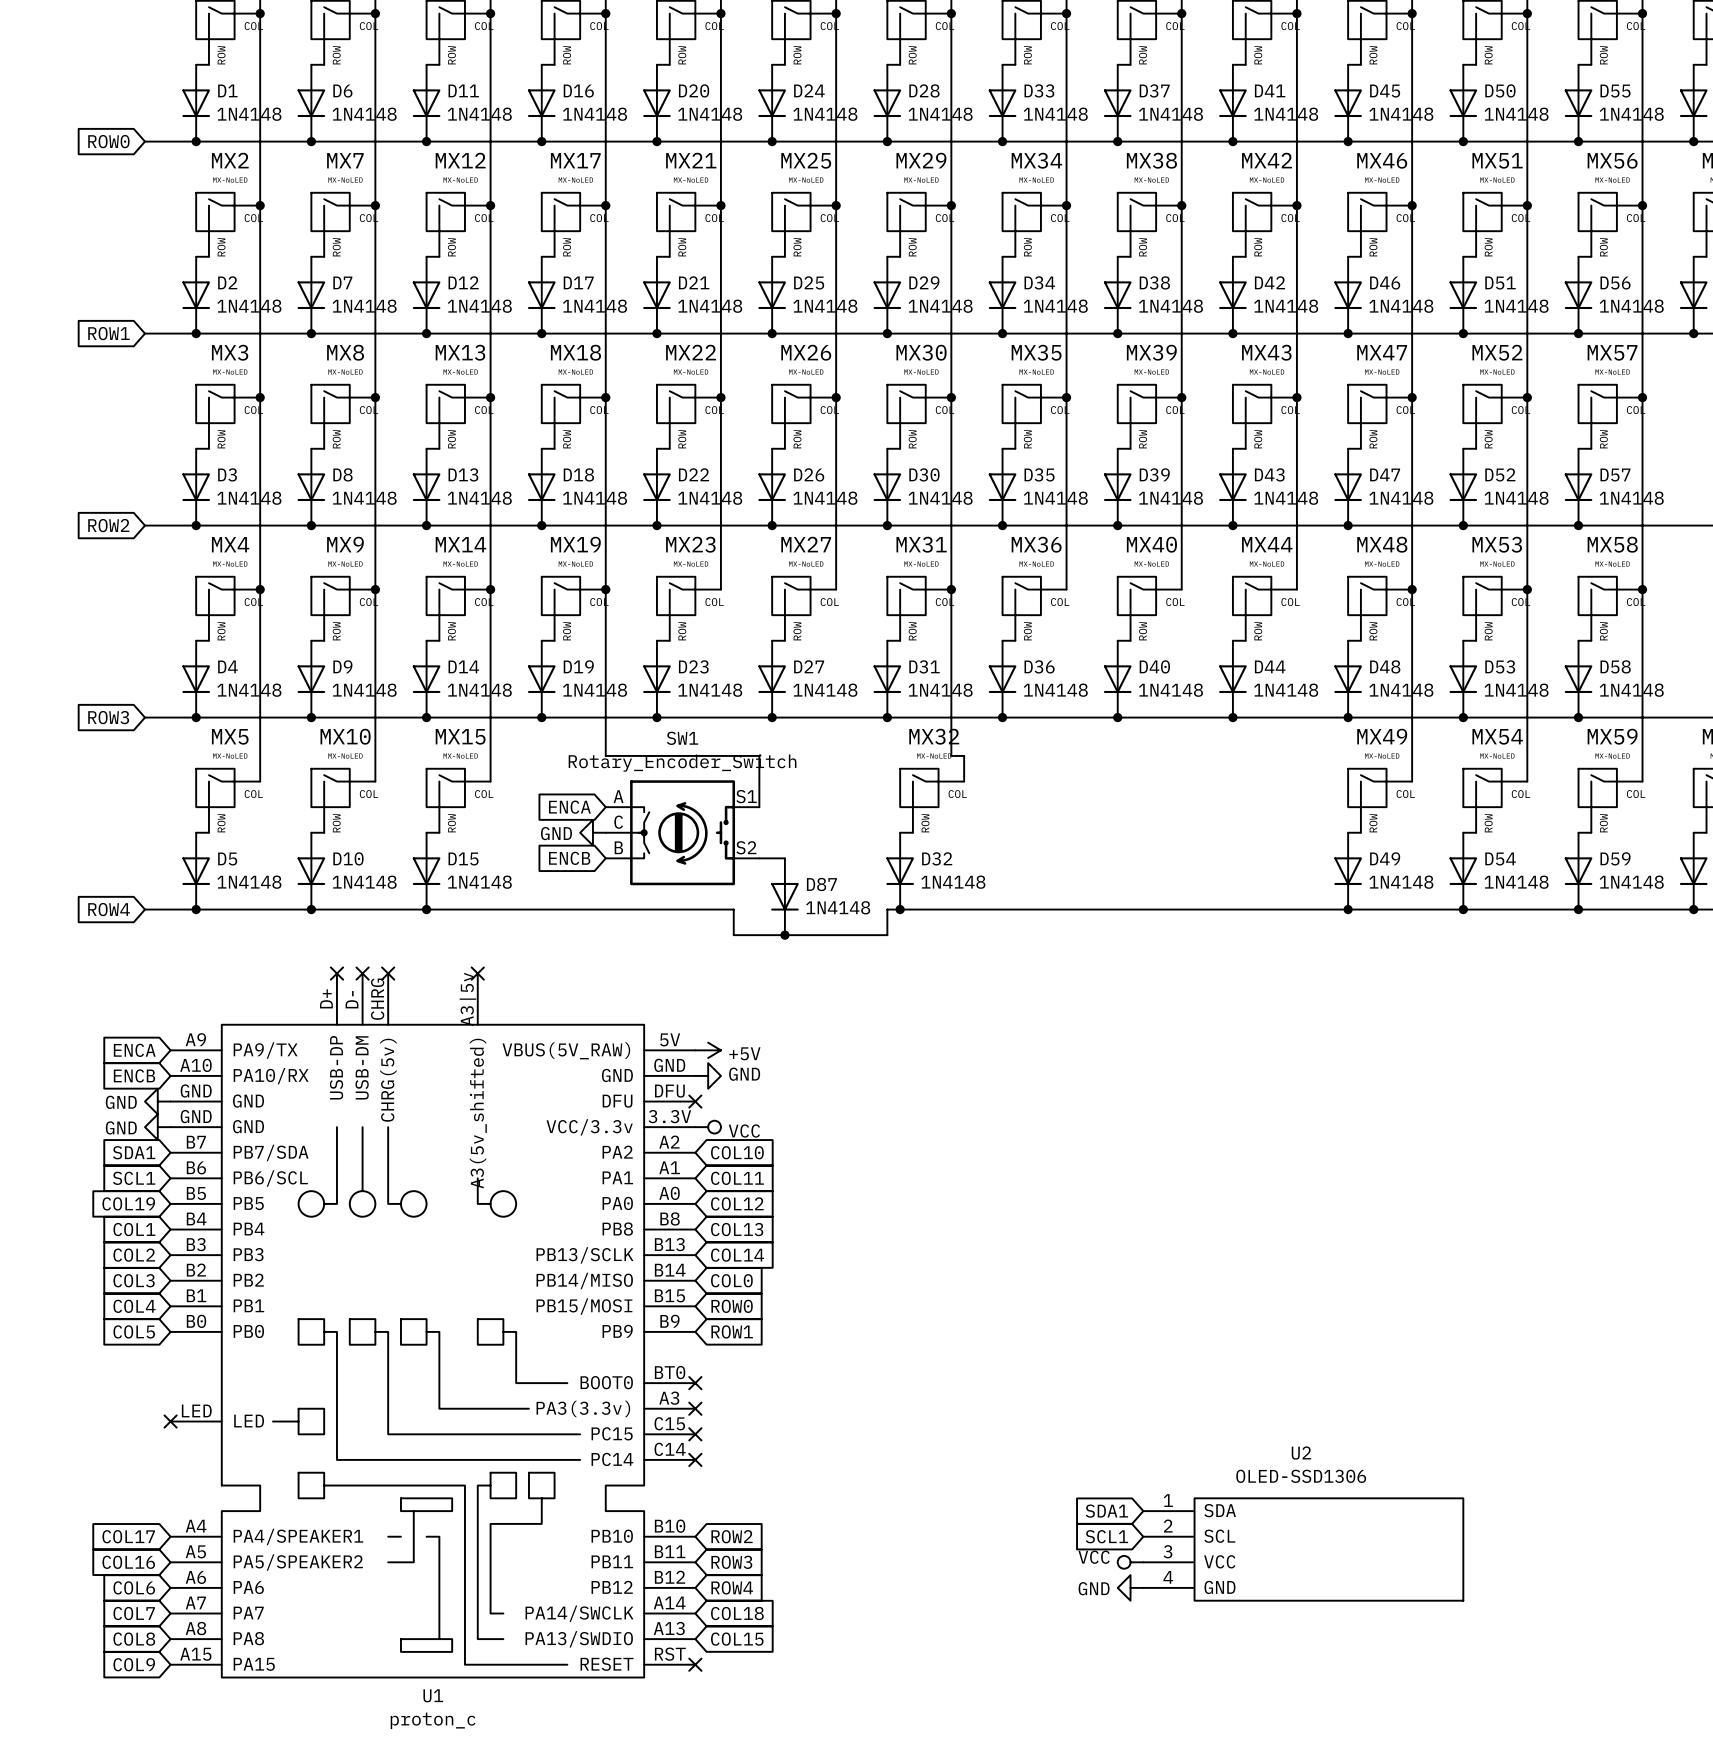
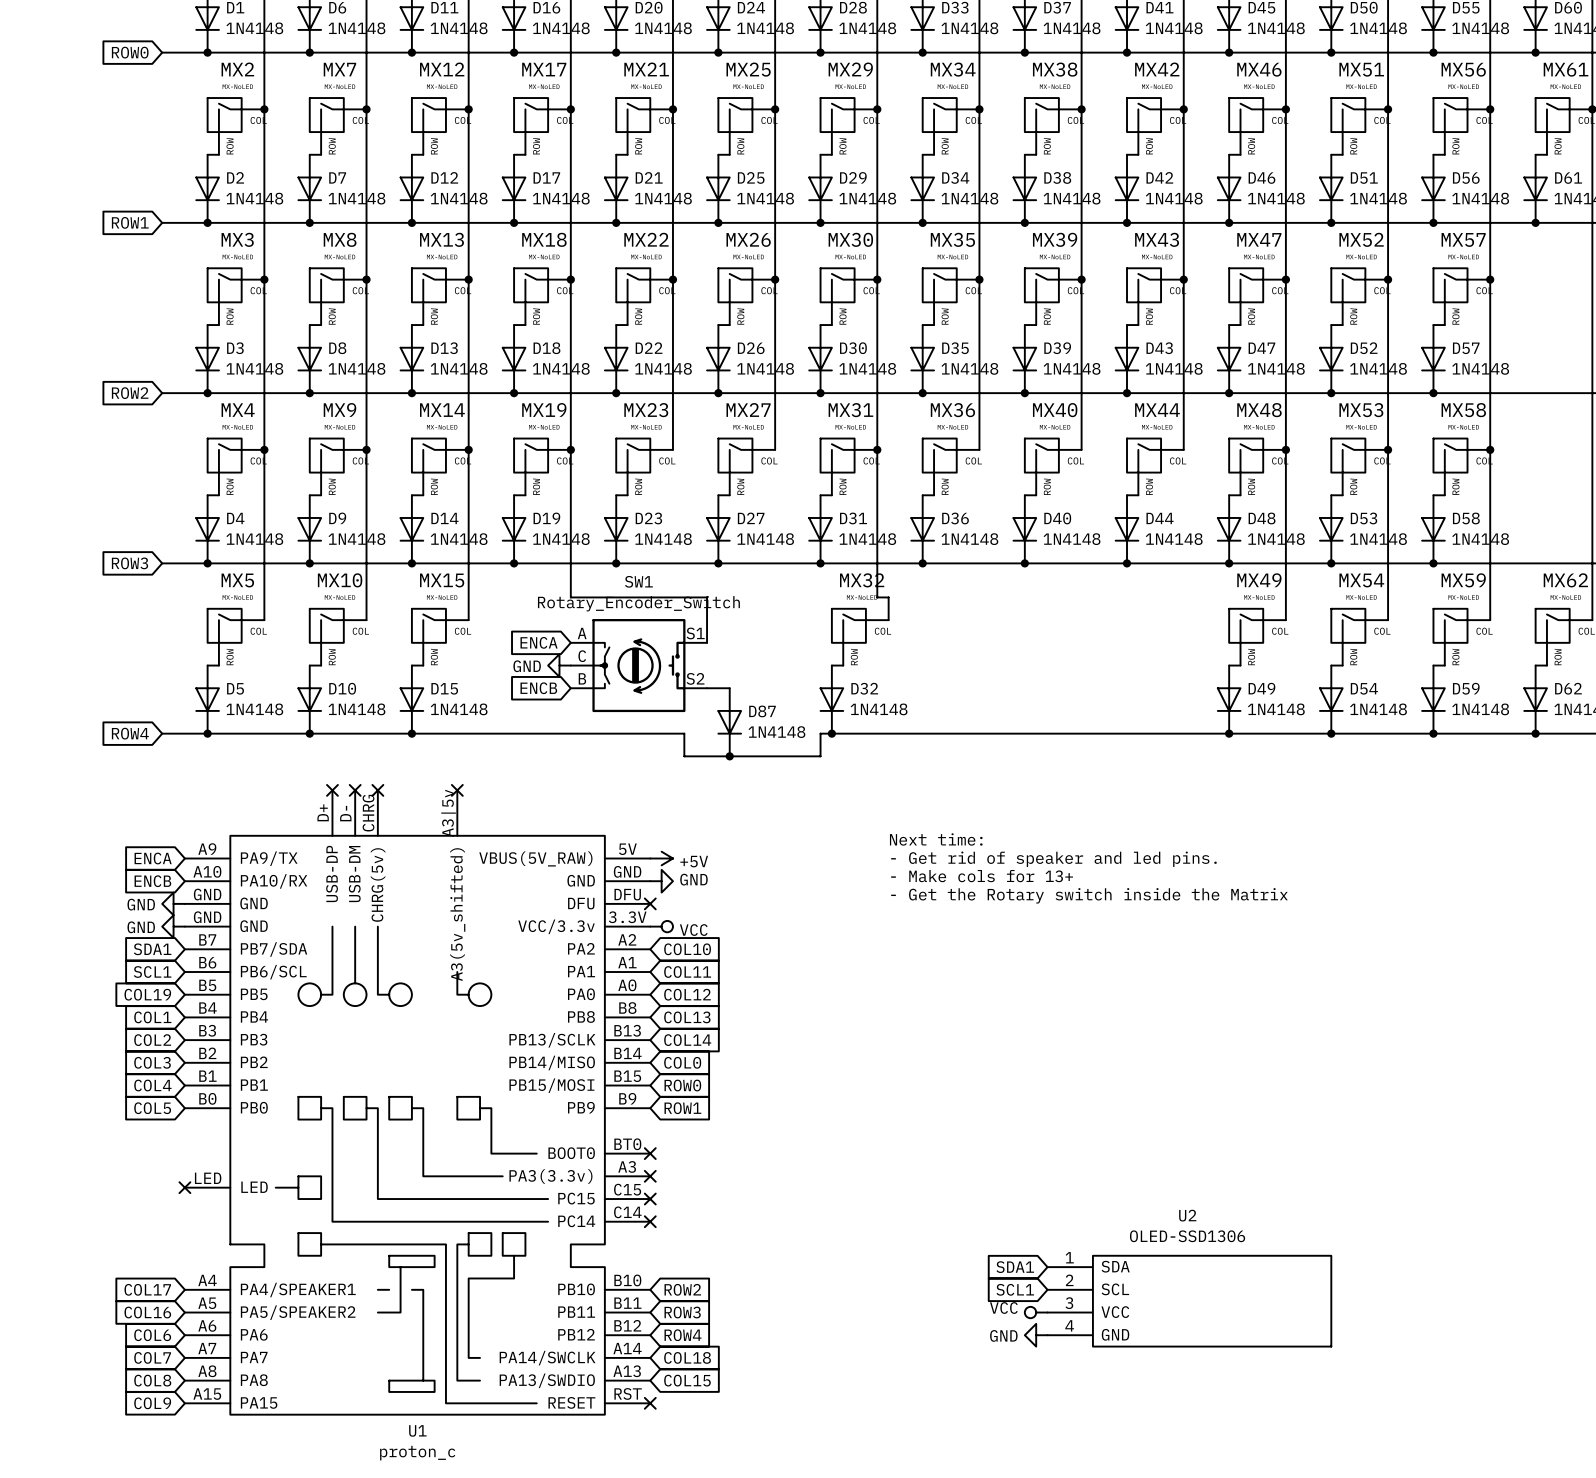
text: none -> Next time: (936, 839)
text: none -> - Get rid of speaker and led pins. (1053, 859)
text: none -> - Make cols for 13+ (982, 876)
text: none -> - Get the Rotary switch inside the Matrix (1089, 895)

